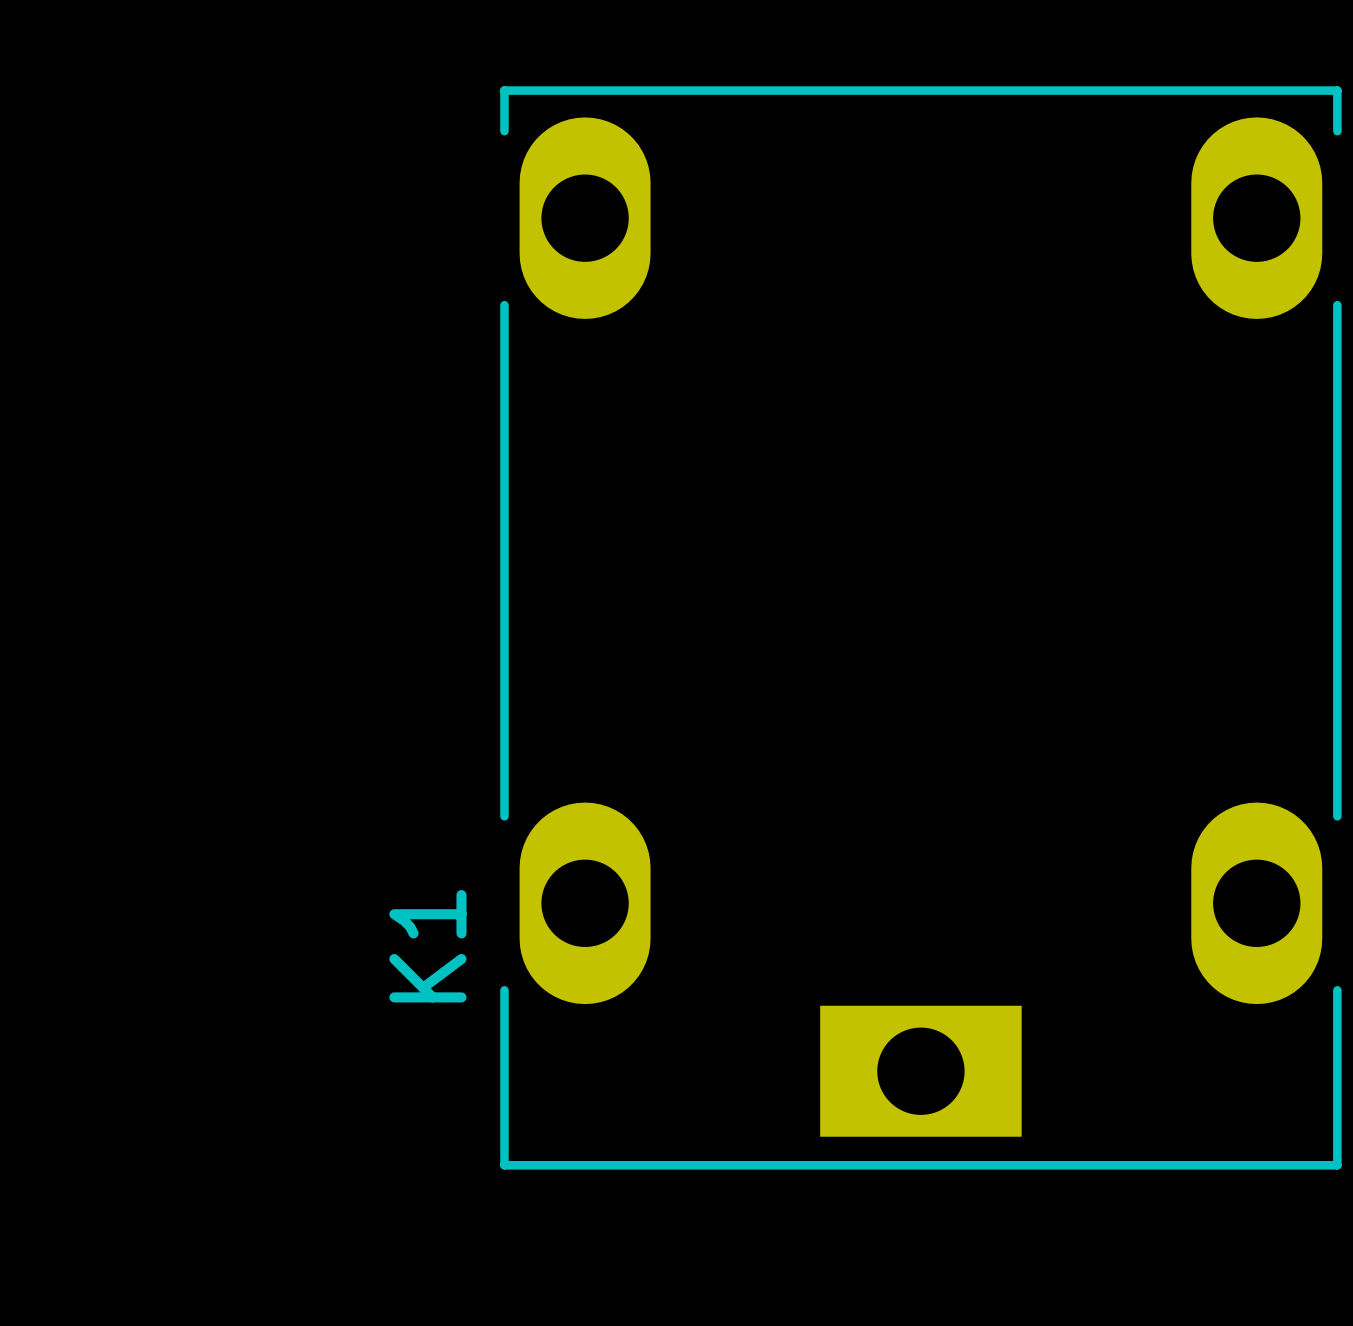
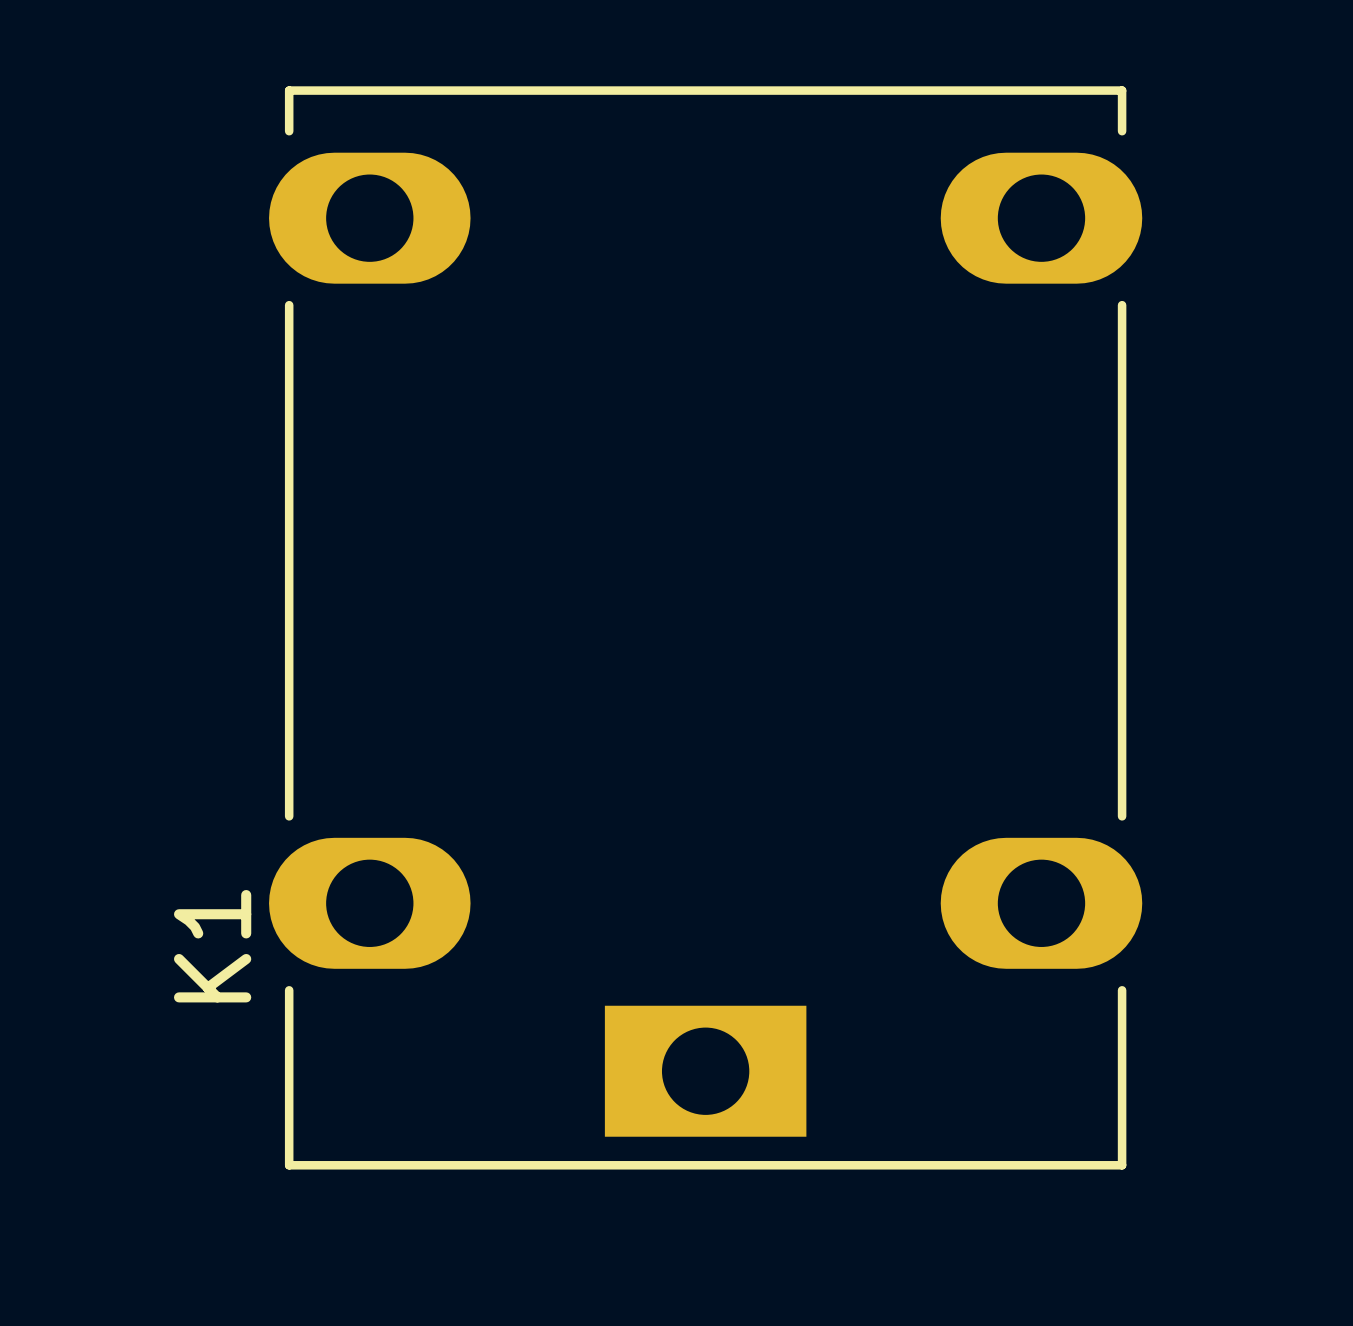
K1 footprint: [500, 86, 1342, 1170] -> [269, 86, 1143, 1170]

